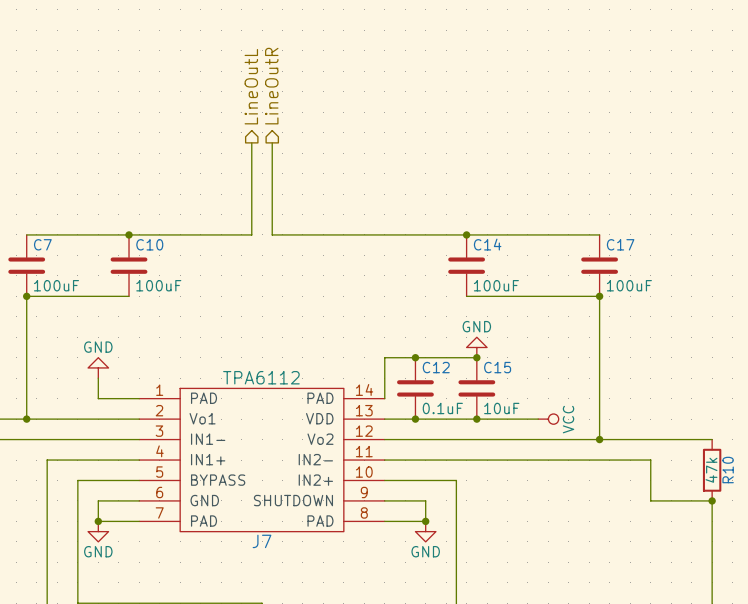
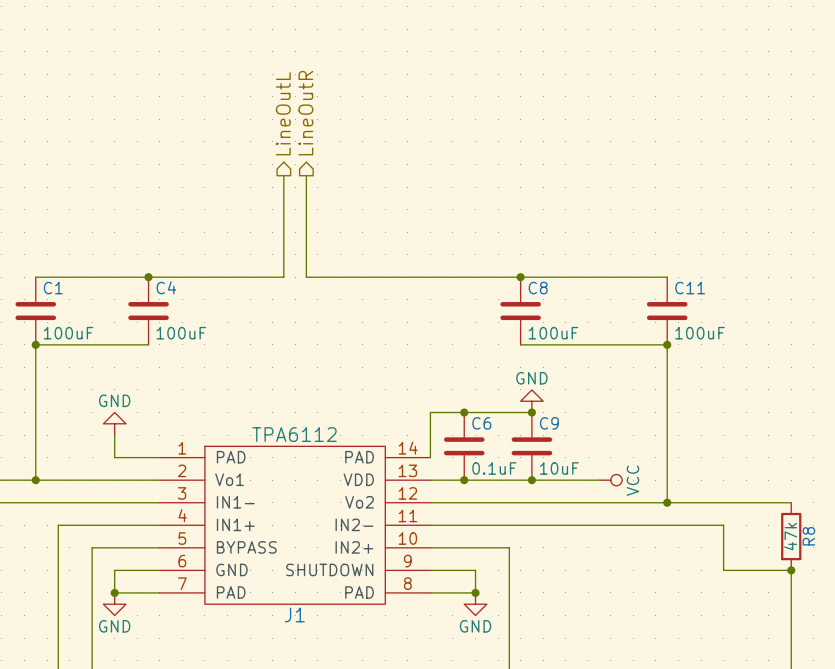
C7 name: C7 (42, 244) -> C1 (53, 288)
C10 name: C10 (149, 244) -> C4 (166, 287)
C14 name: C14 (487, 244) -> C8 (538, 288)
C17 name: C17 (620, 244) -> C11 (690, 288)
C12 name: C12 (436, 367) -> C6 (481, 423)
C15 name: C15 (497, 367) -> C9 (549, 423)
R10 name: R10 (728, 470) -> R8 (808, 536)
J7 name: J7 (262, 541) -> J1 (294, 614)

